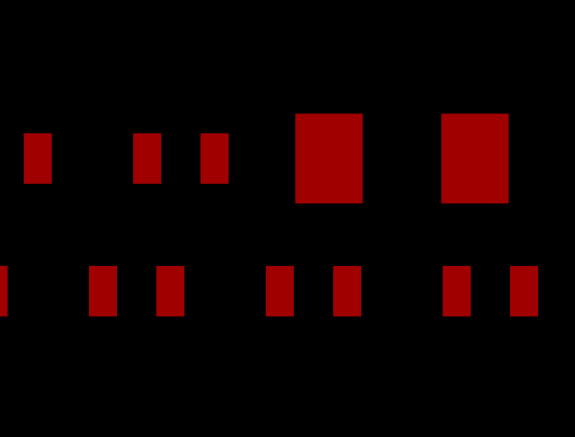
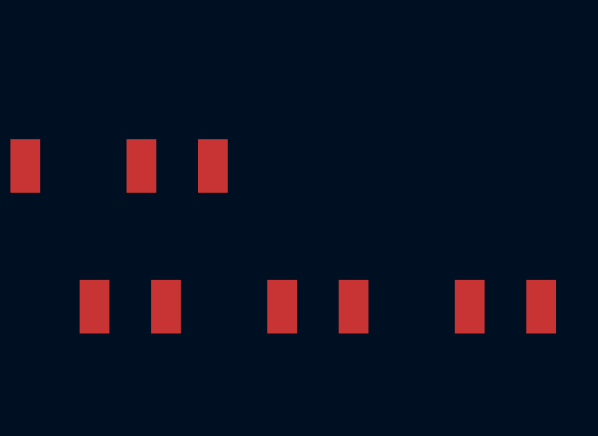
part: (401, 158) -> none

